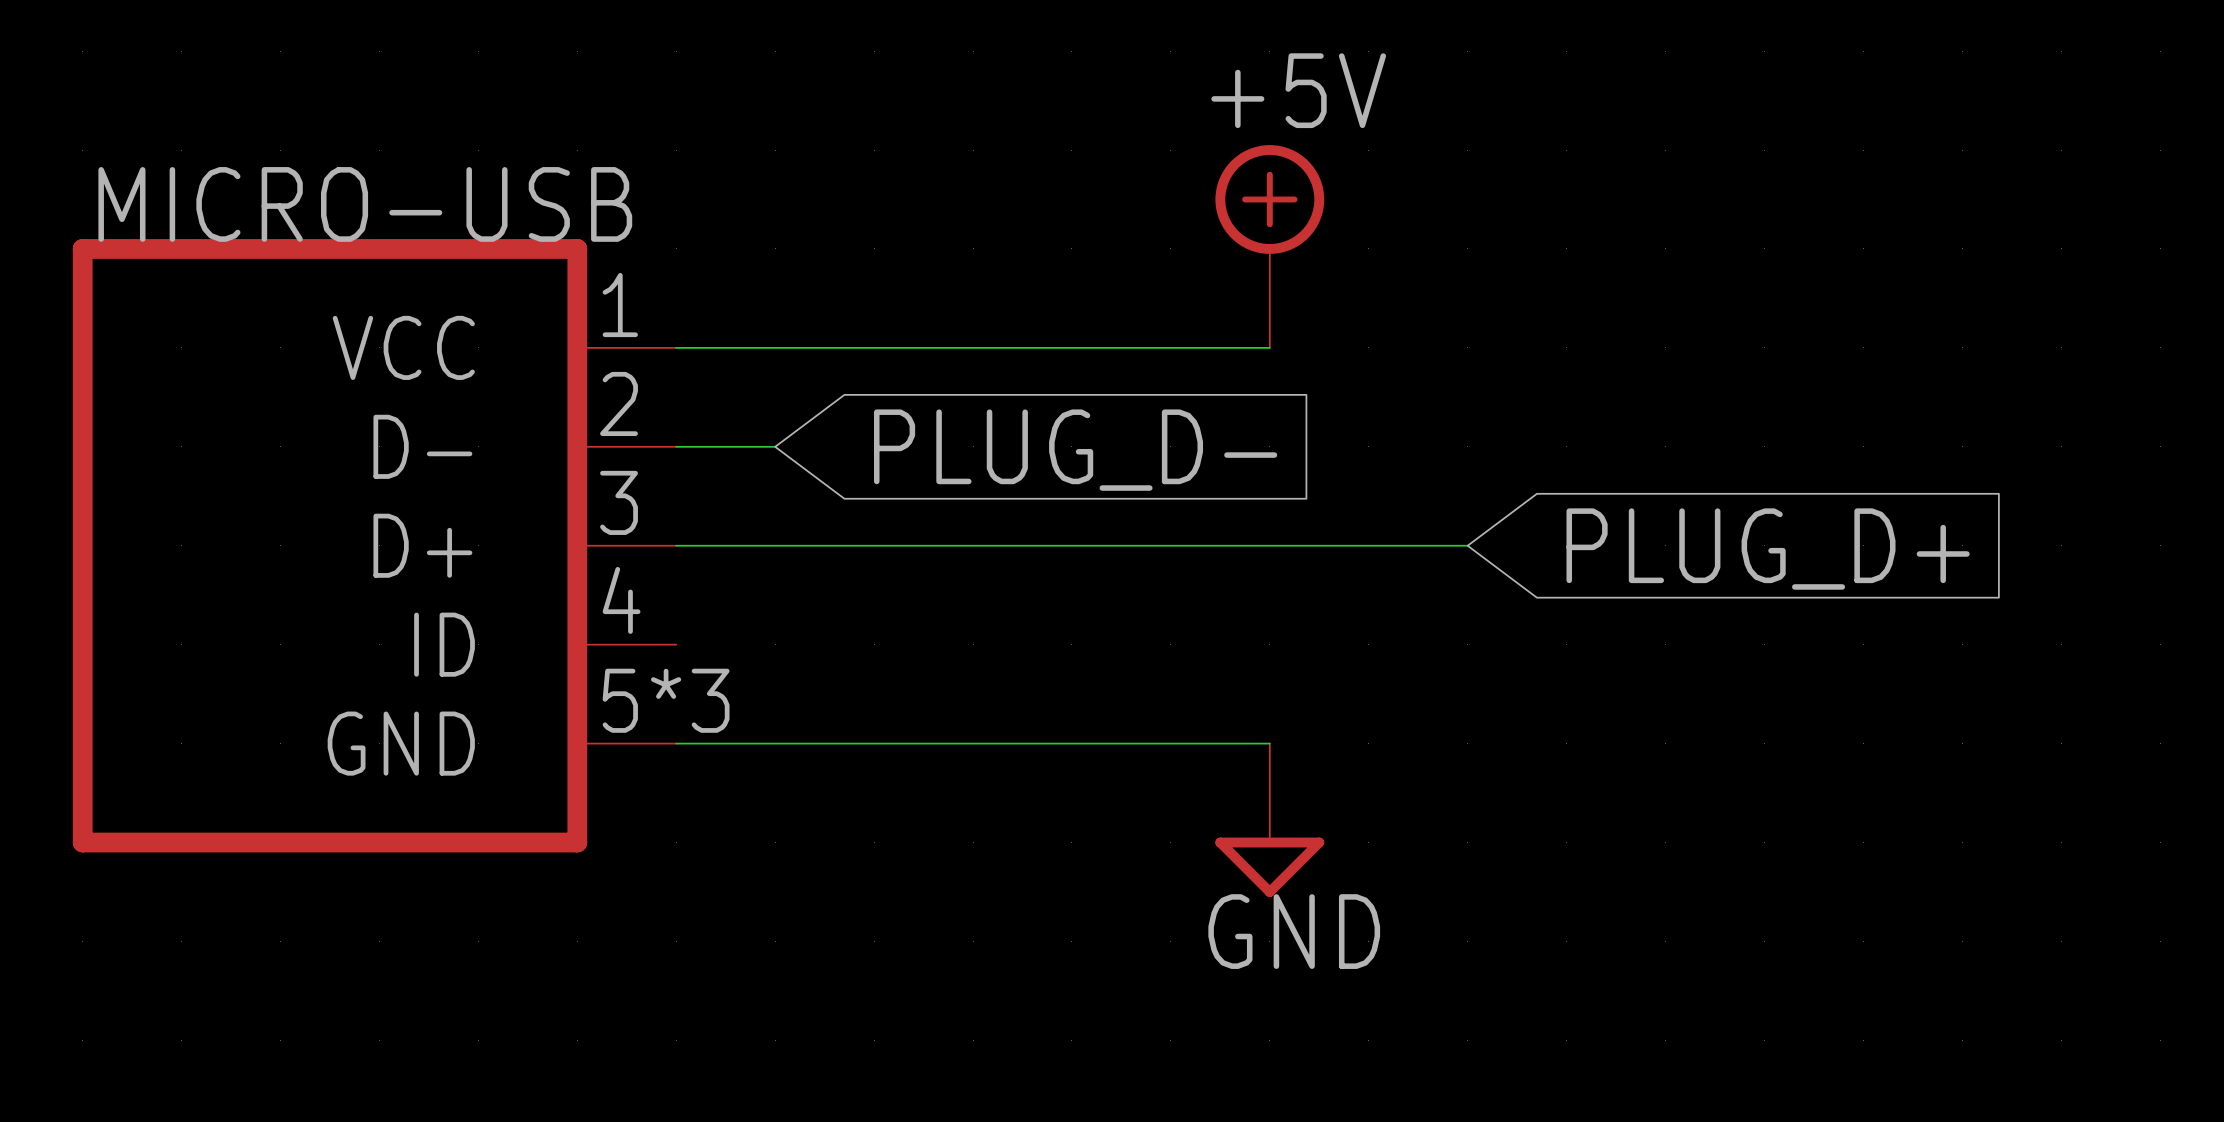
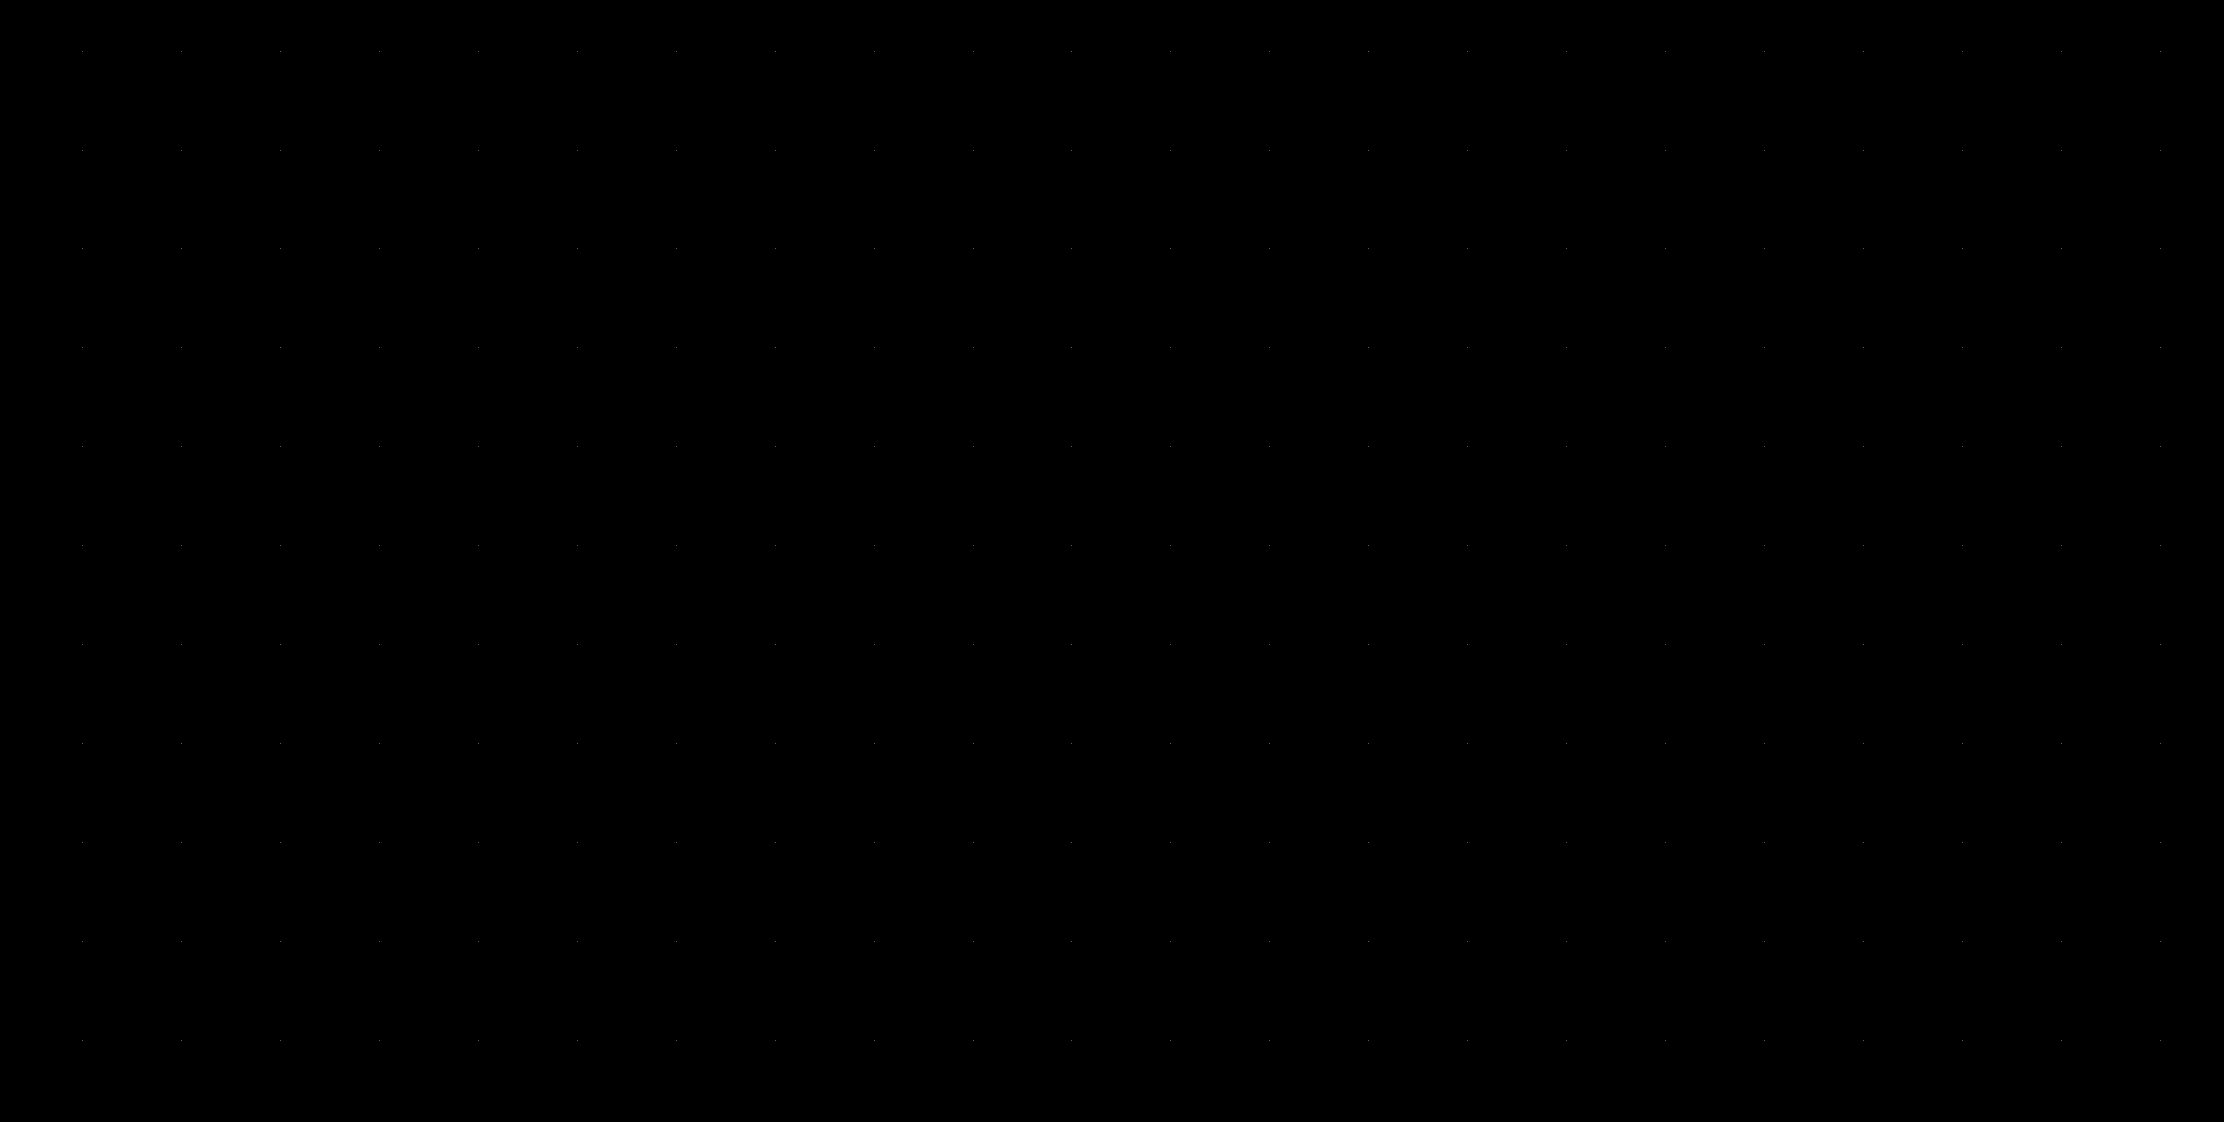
power symbol: +5V (1269, 246) -> none
wire: (676, 347) (1269, 347) -> none
wire: (676, 446) (775, 446) -> none
global label: PLUG_D- (1075, 450) -> none
part: MICRO-USB (374, 545) -> none
wire: (676, 545) (1467, 545) -> none
global label: PLUG_D+ (1768, 549) -> none
wire: (676, 743) (1269, 743) -> none
power symbol: GND (1269, 820) -> none

